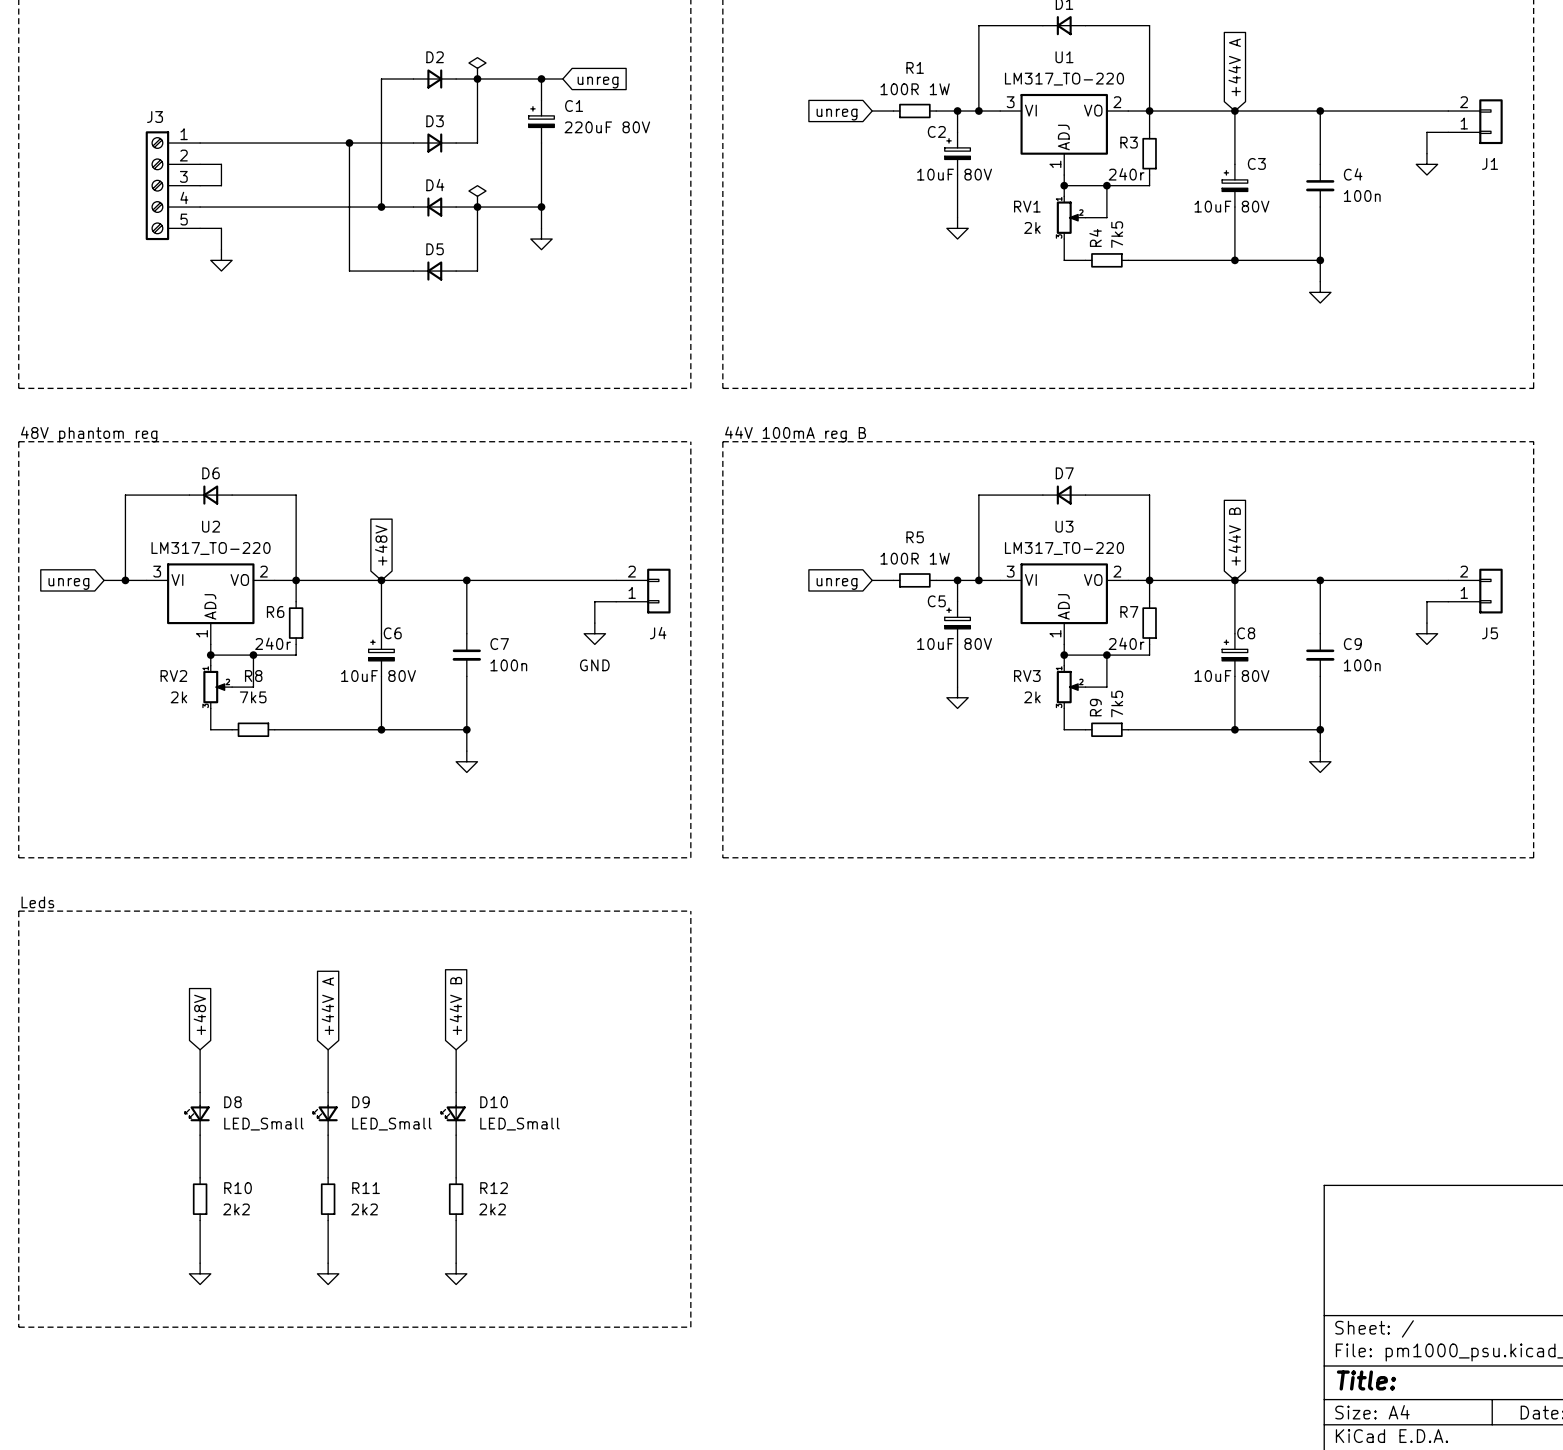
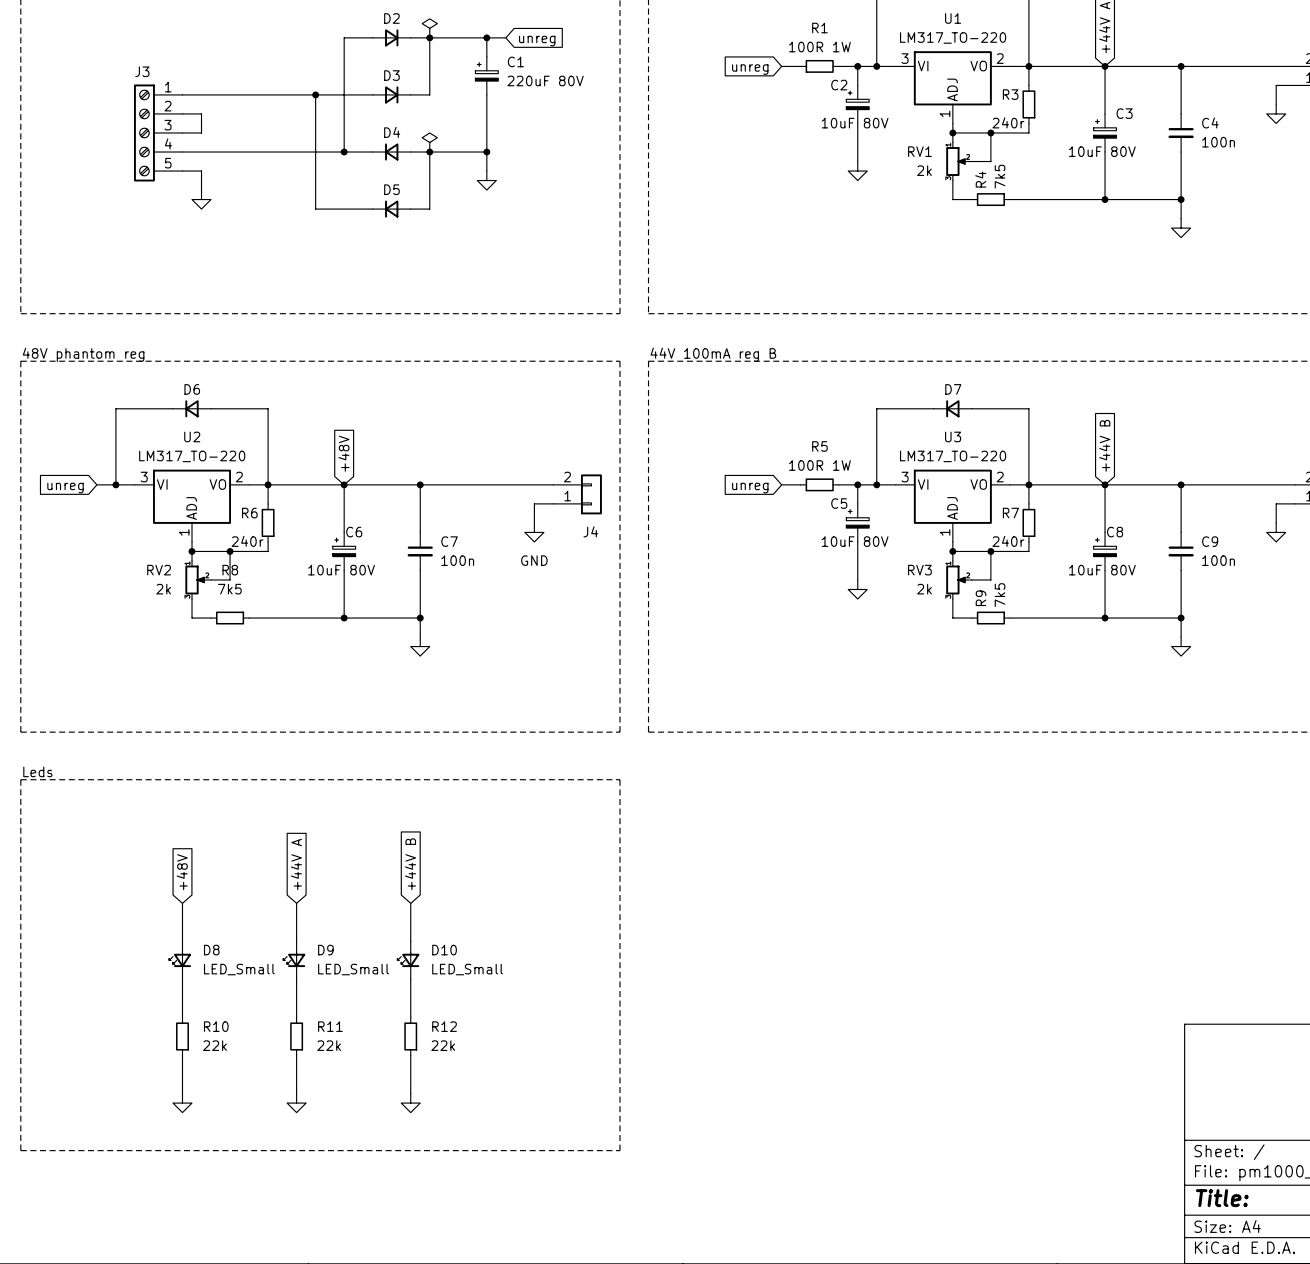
R10 value: 2k2 (236, 1209) -> 22k (214, 1045)
R11 value: 2k2 (364, 1209) -> 22k (329, 1045)
R12 value: 2k2 (492, 1209) -> 22k (443, 1045)

